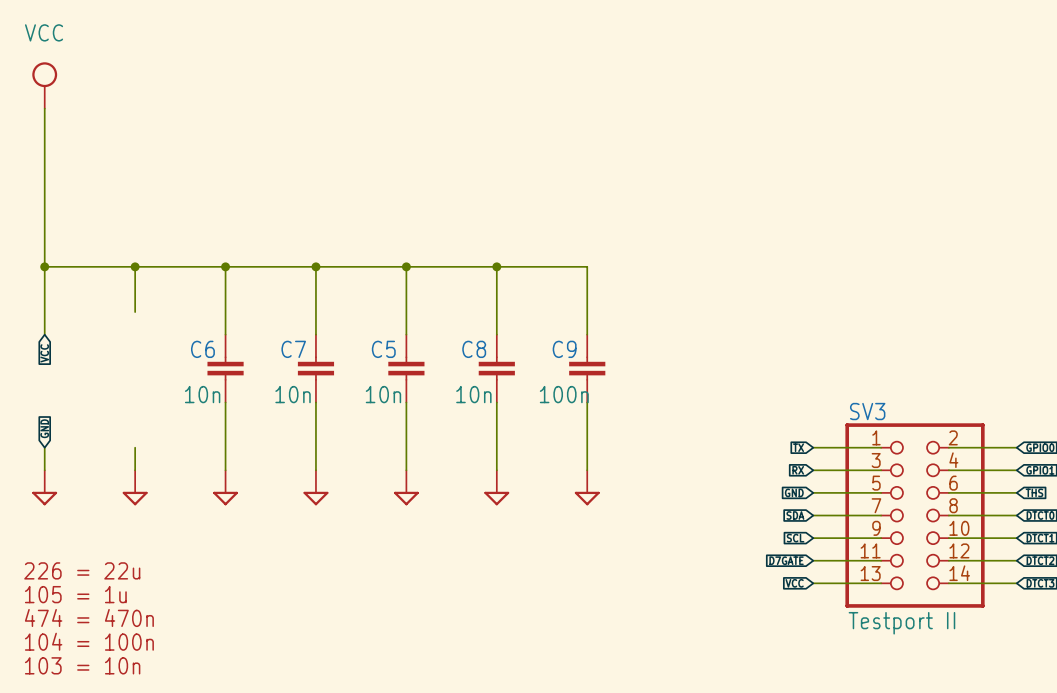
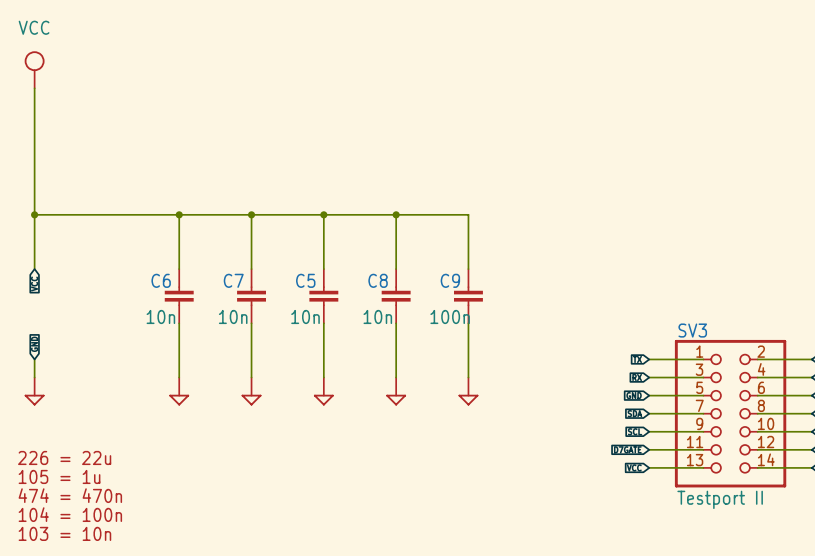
wire: (135, 266) (135, 312) -> none
junction: (135, 266) -> none
wire: (135, 447) (135, 470) -> none
power symbol: (135, 487) -> none

